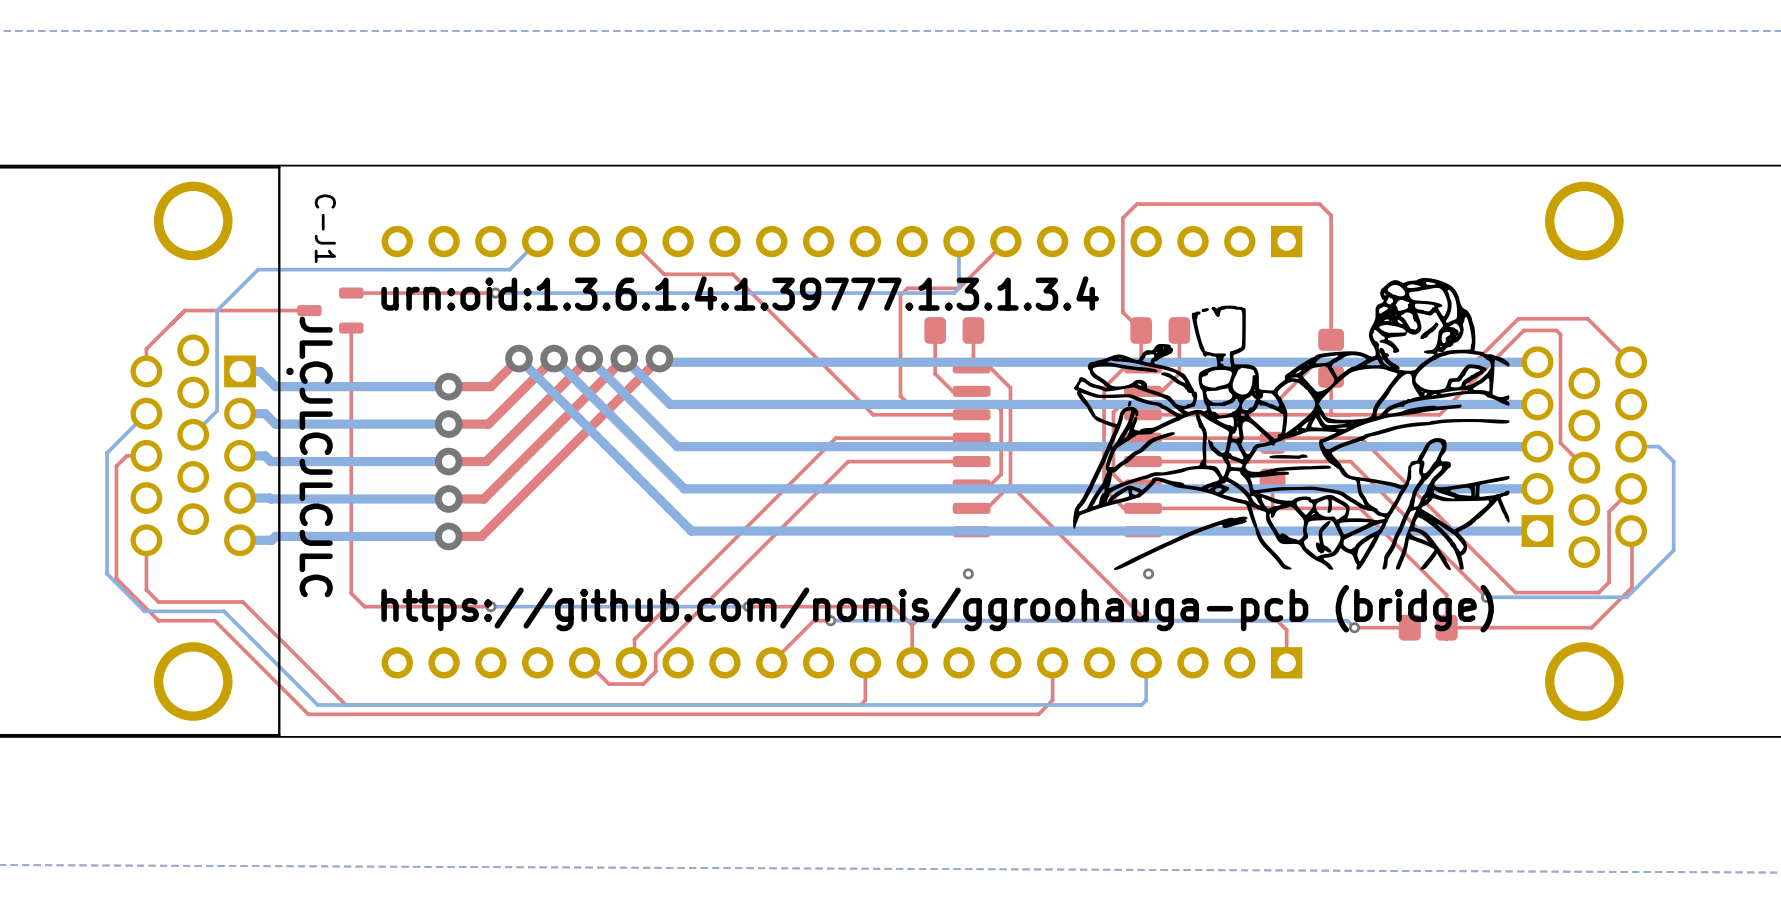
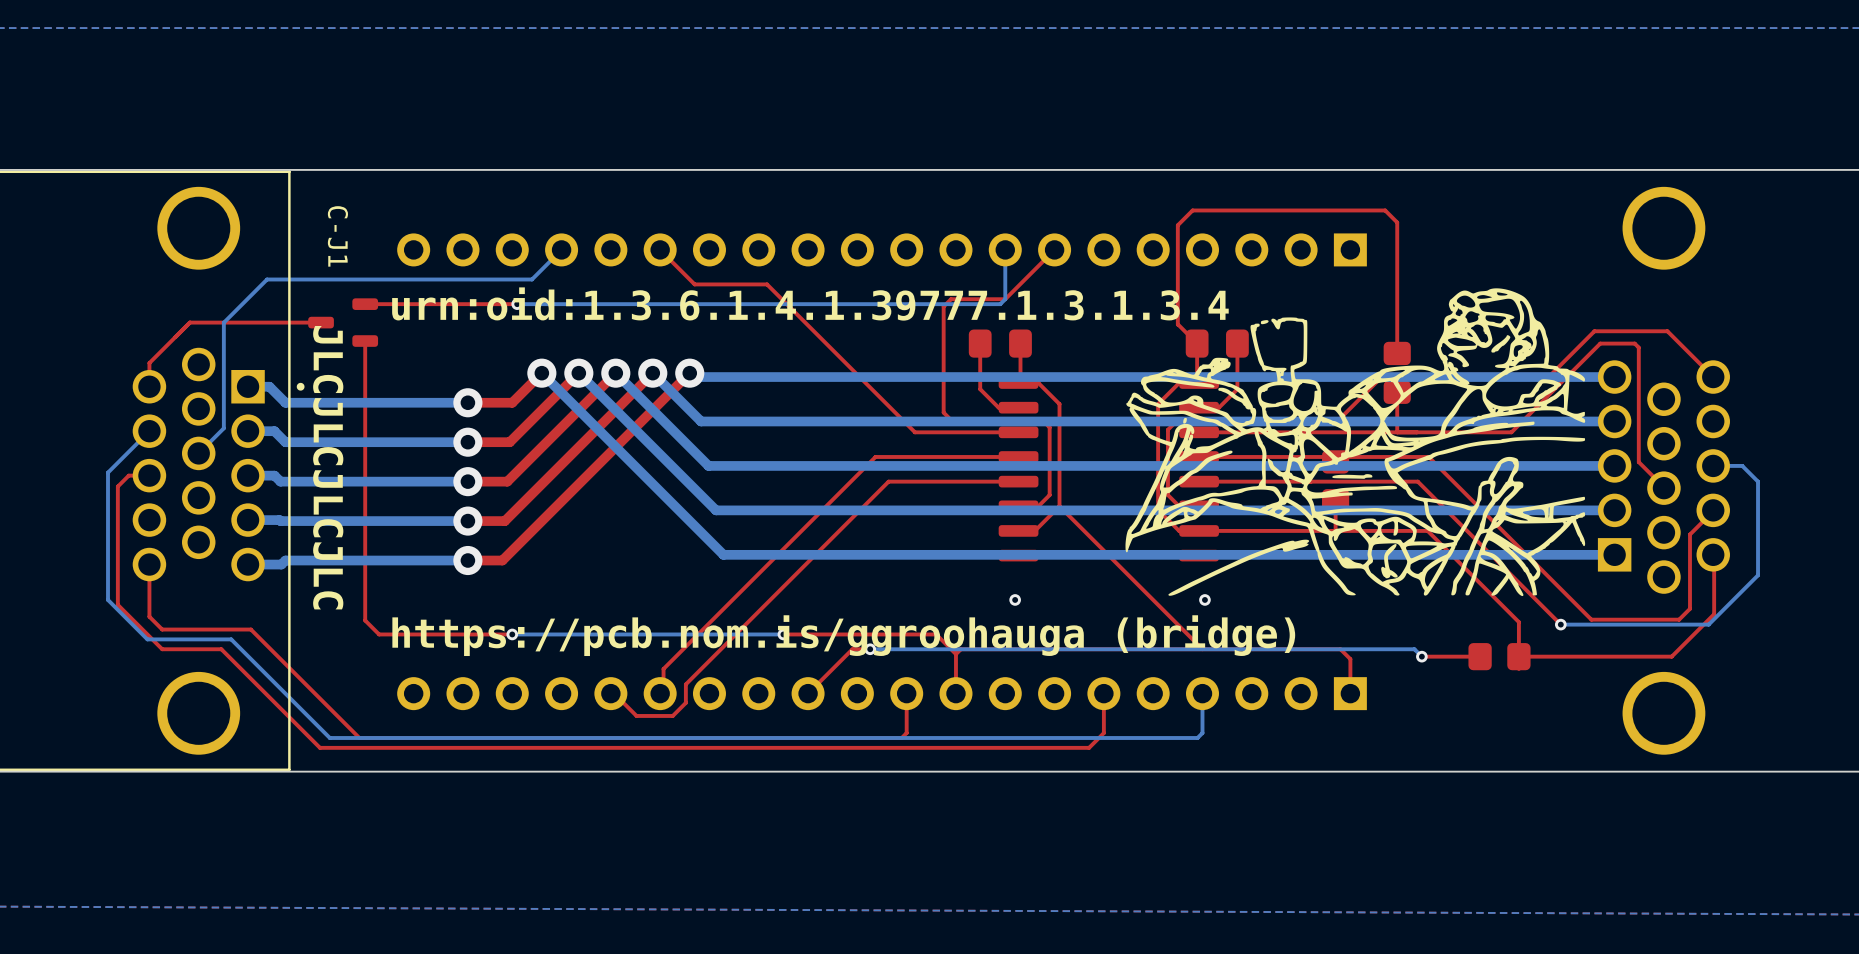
text: https://github.com/nomis/ggroohauga-pcb (bridge) (937, 608) -> https://pcb.nom.is/ggroohauga (bridge) (843, 635)

